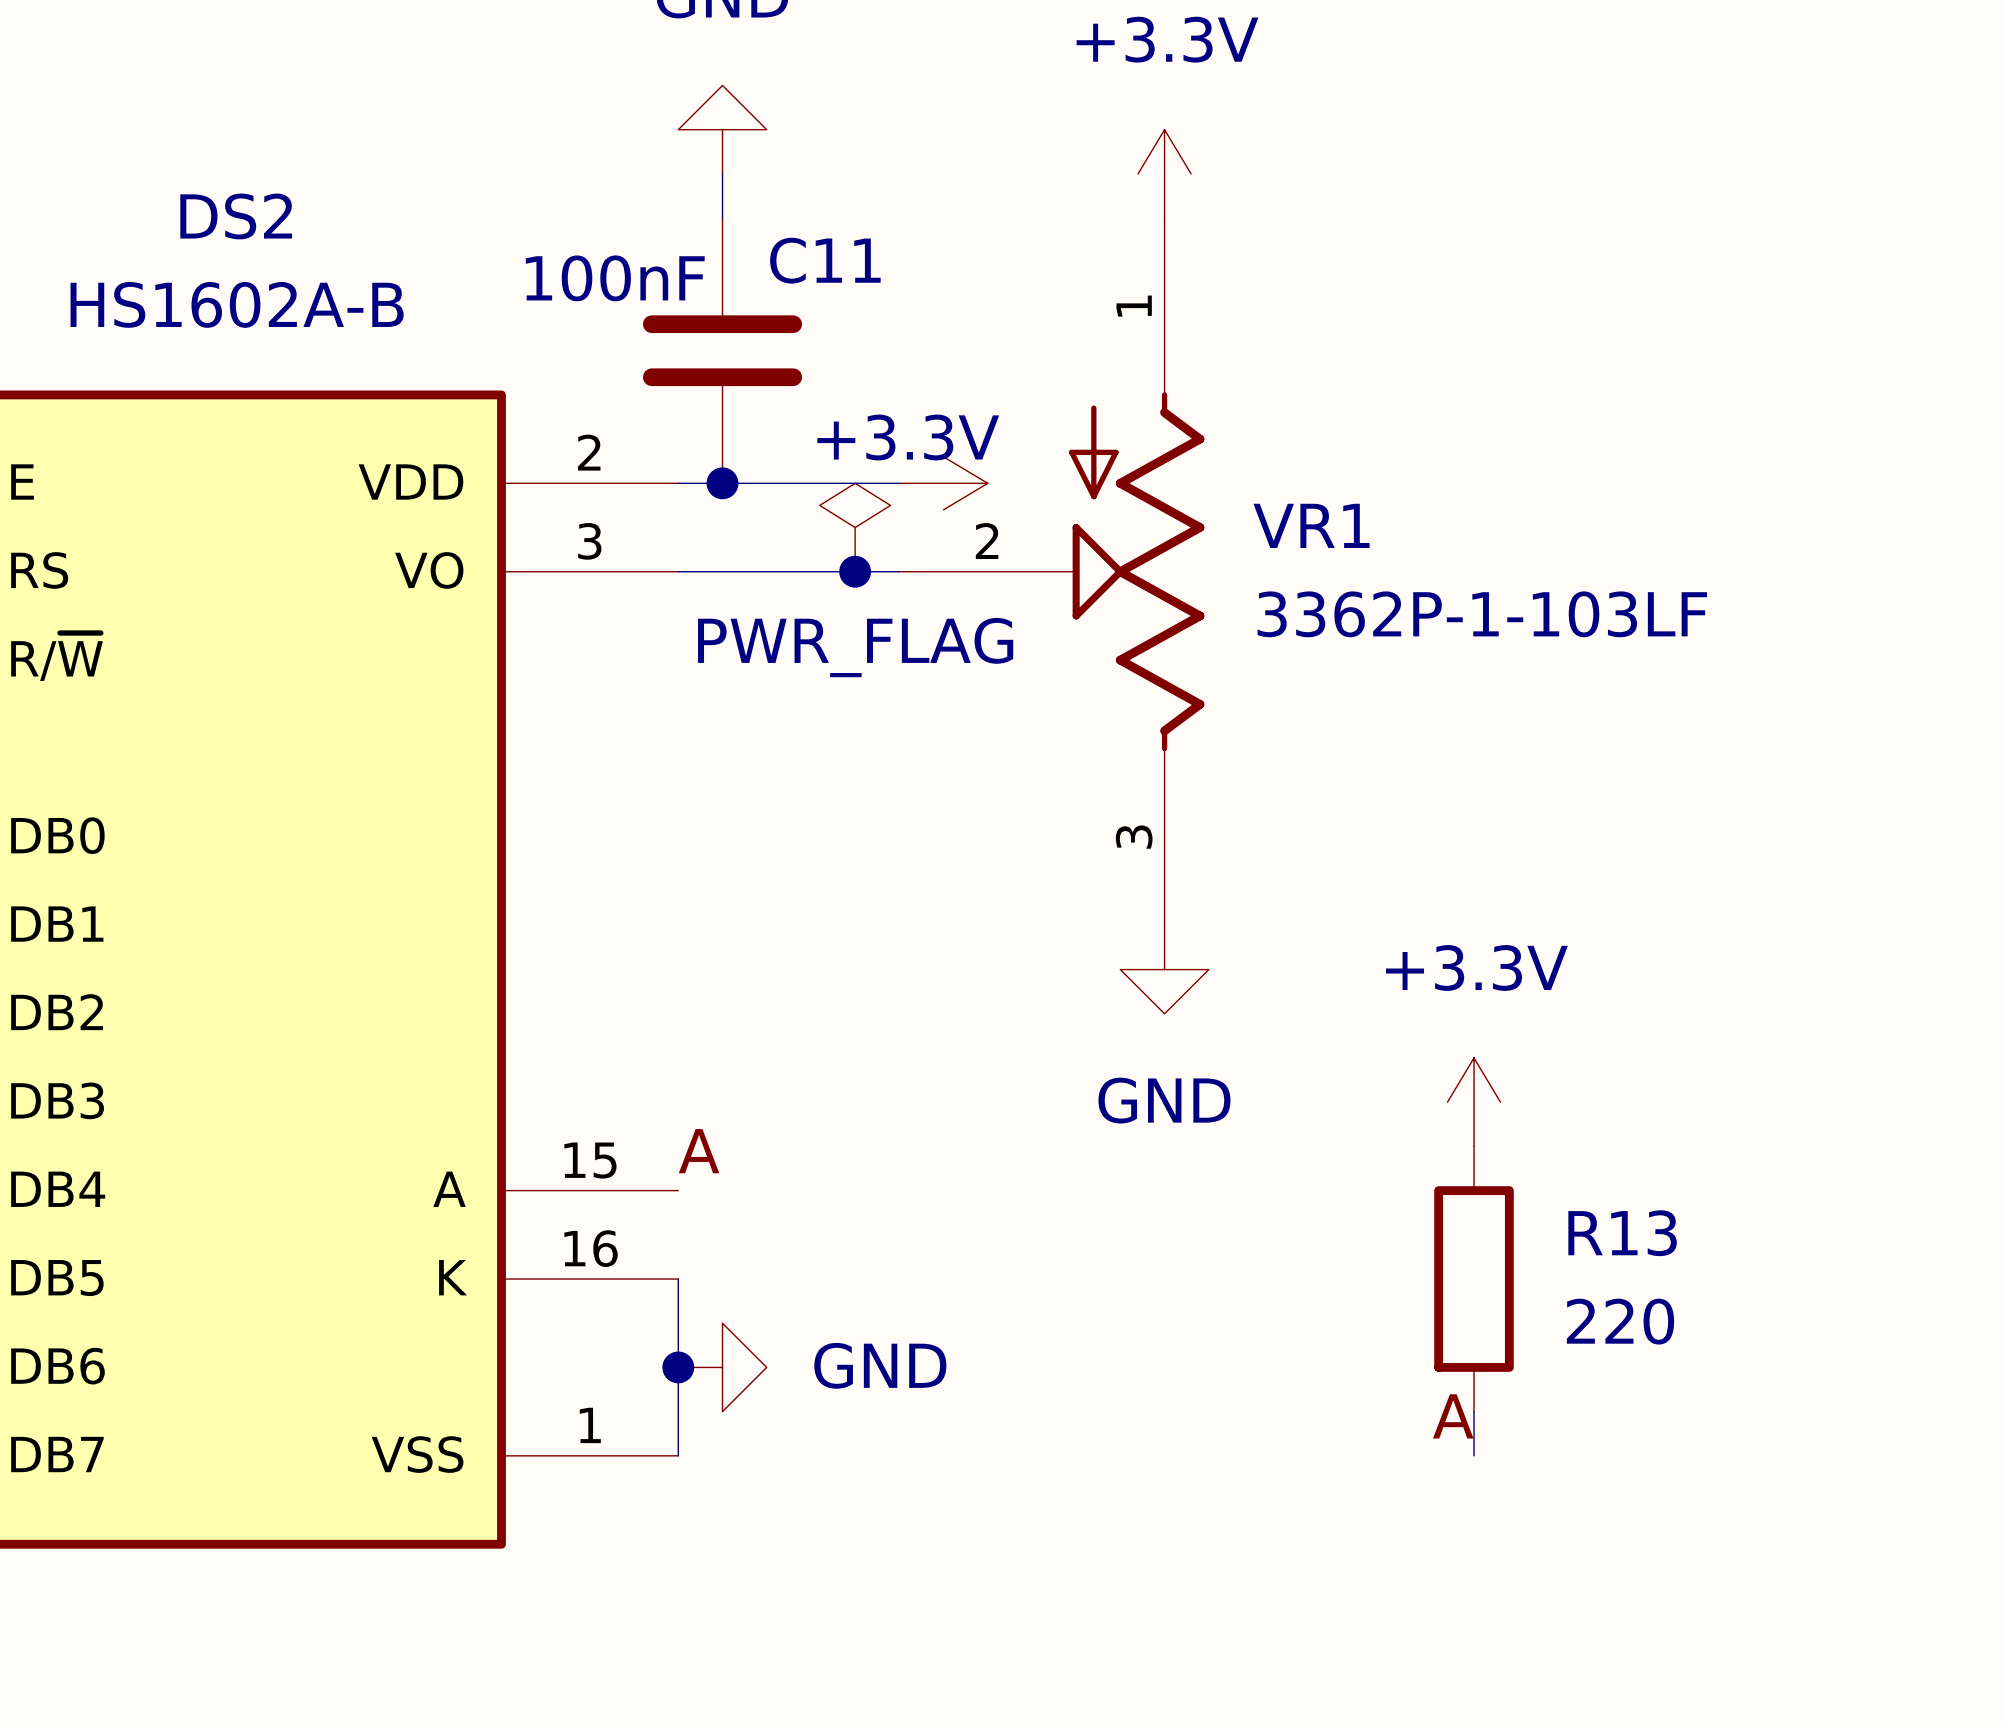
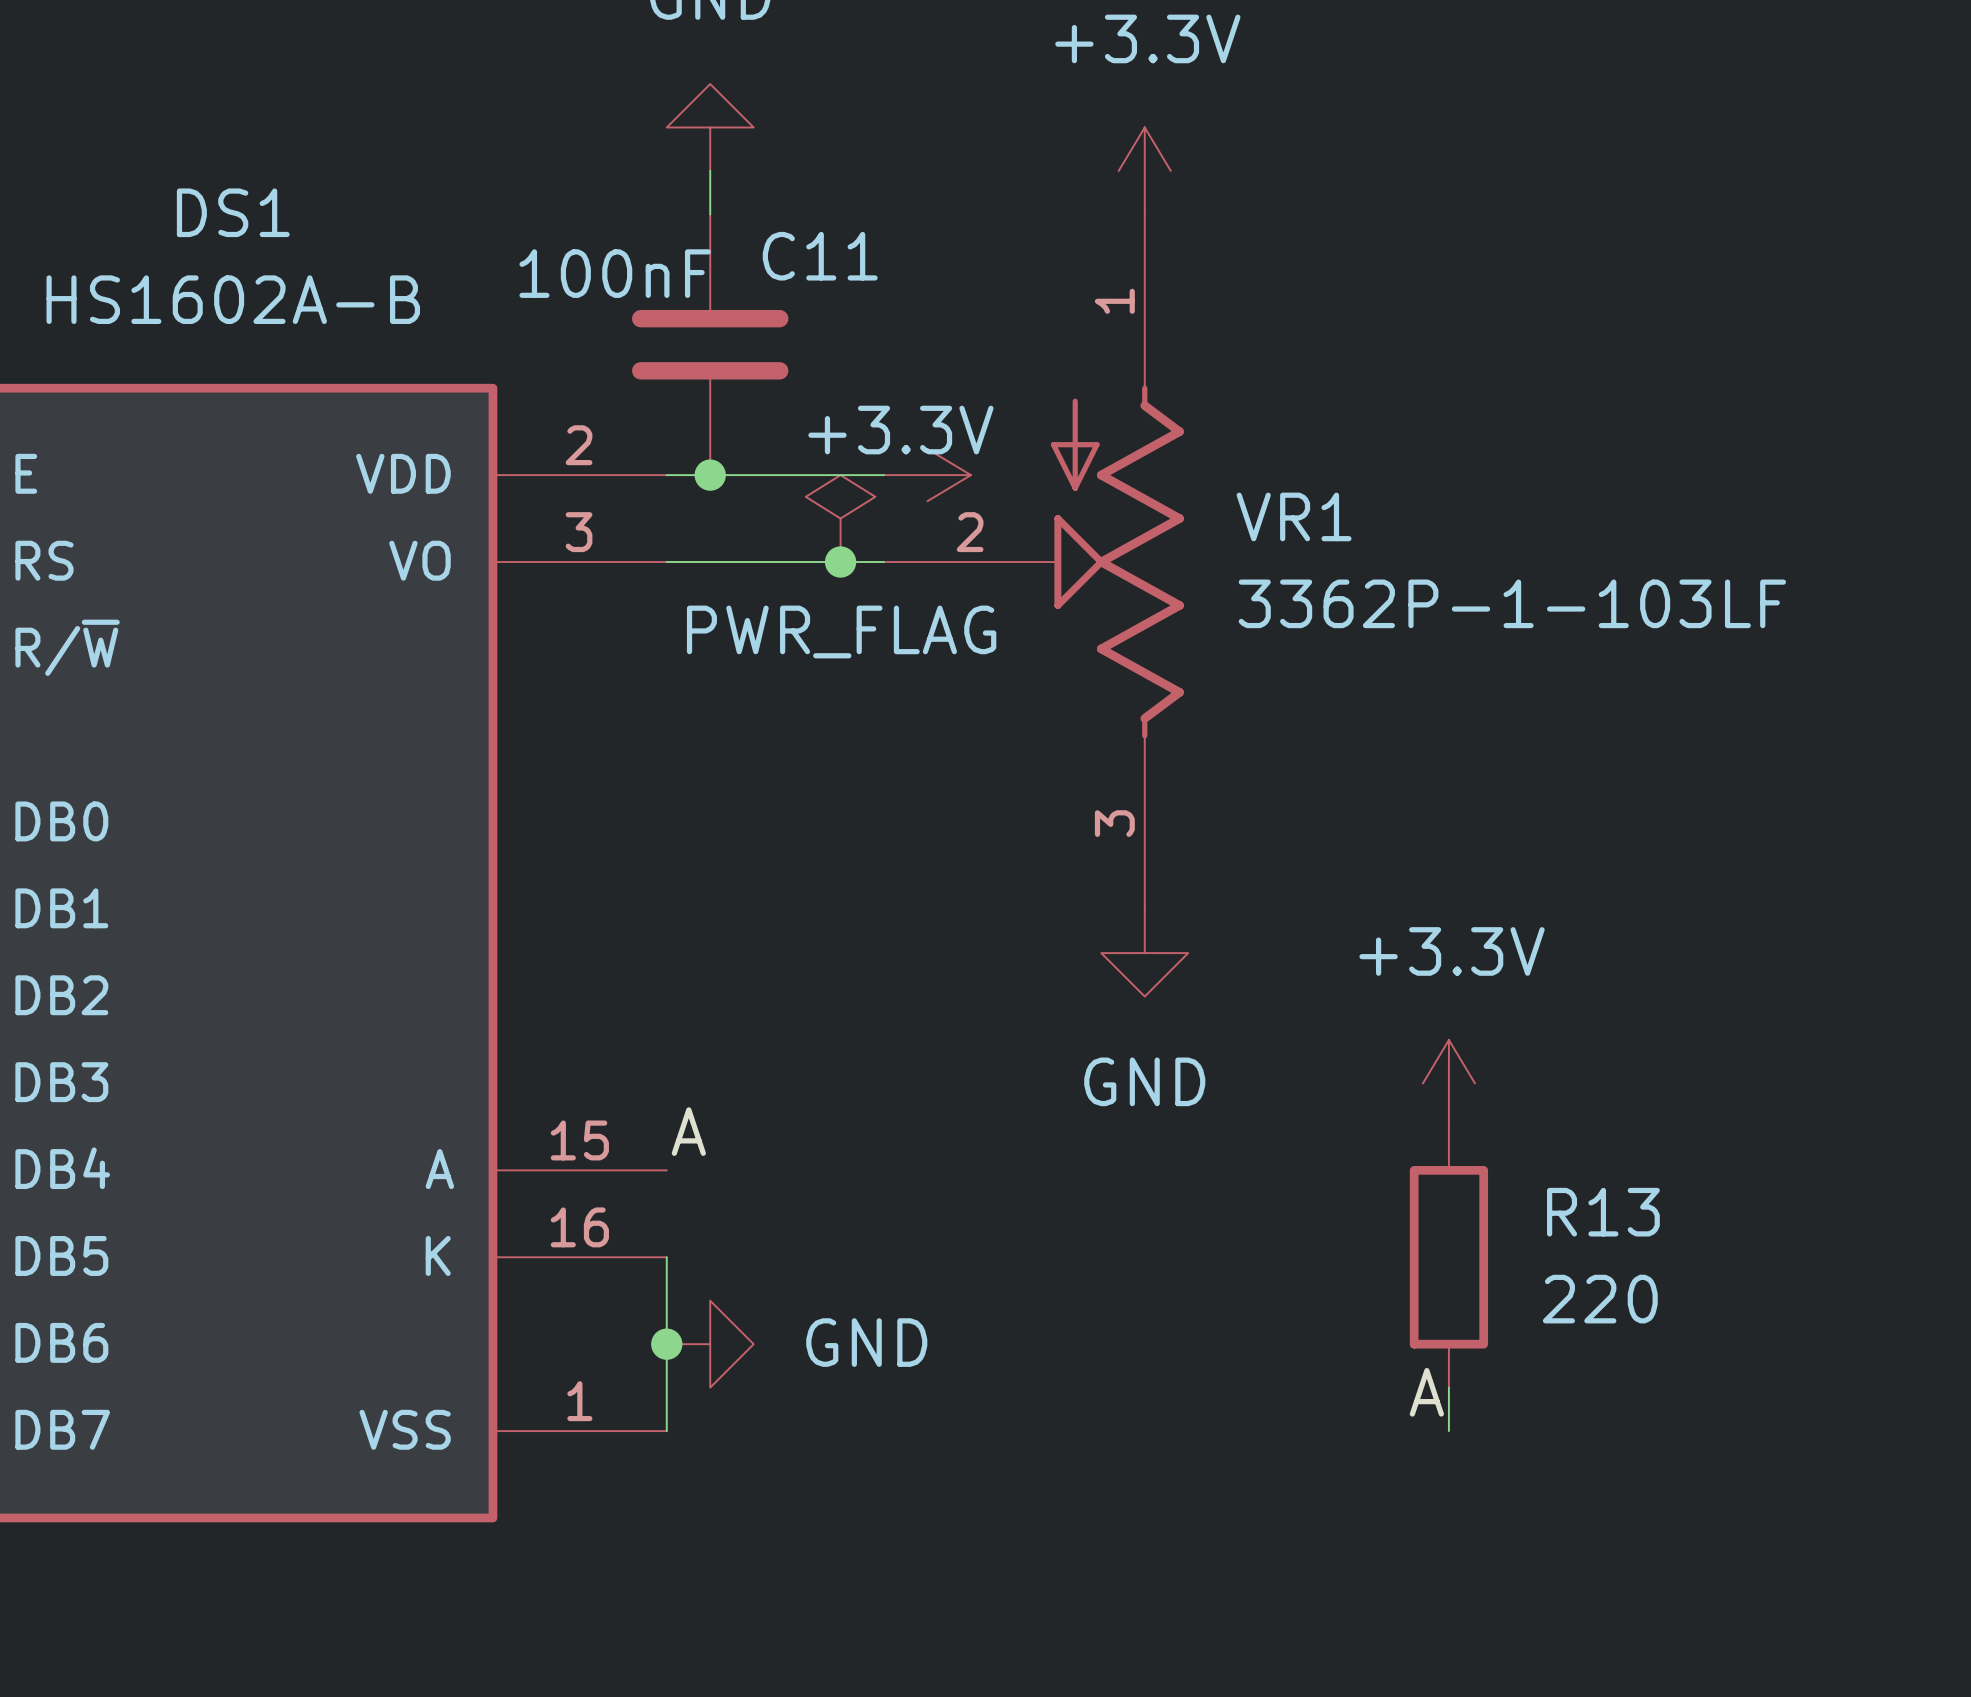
DS2 name: DS2 (236, 216) -> DS1 (233, 212)

